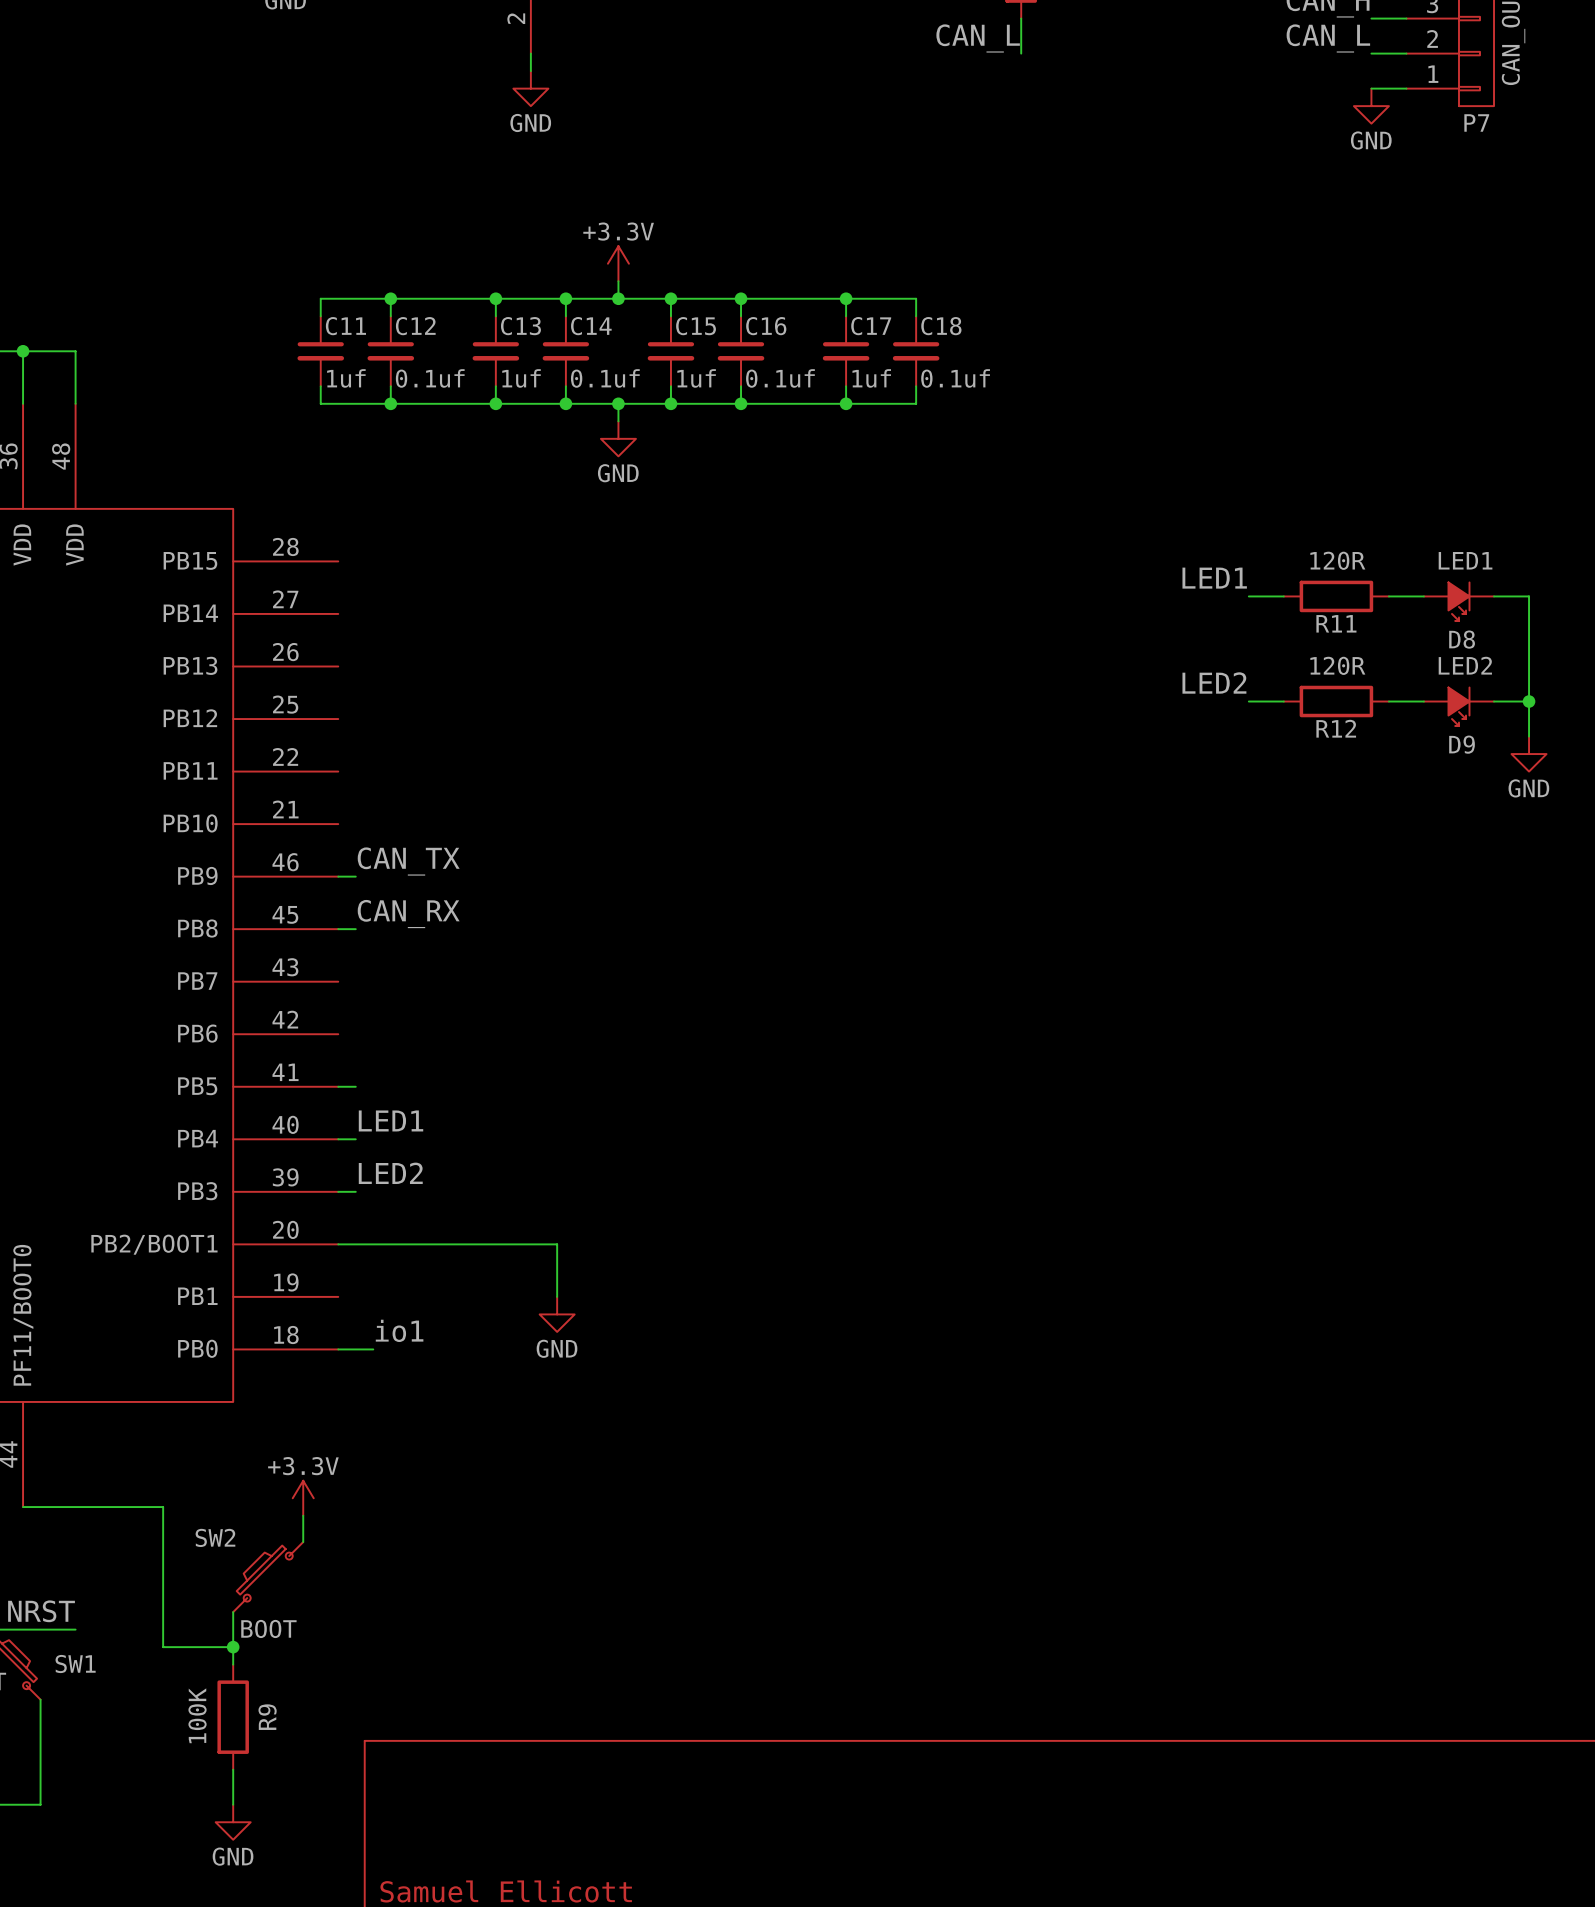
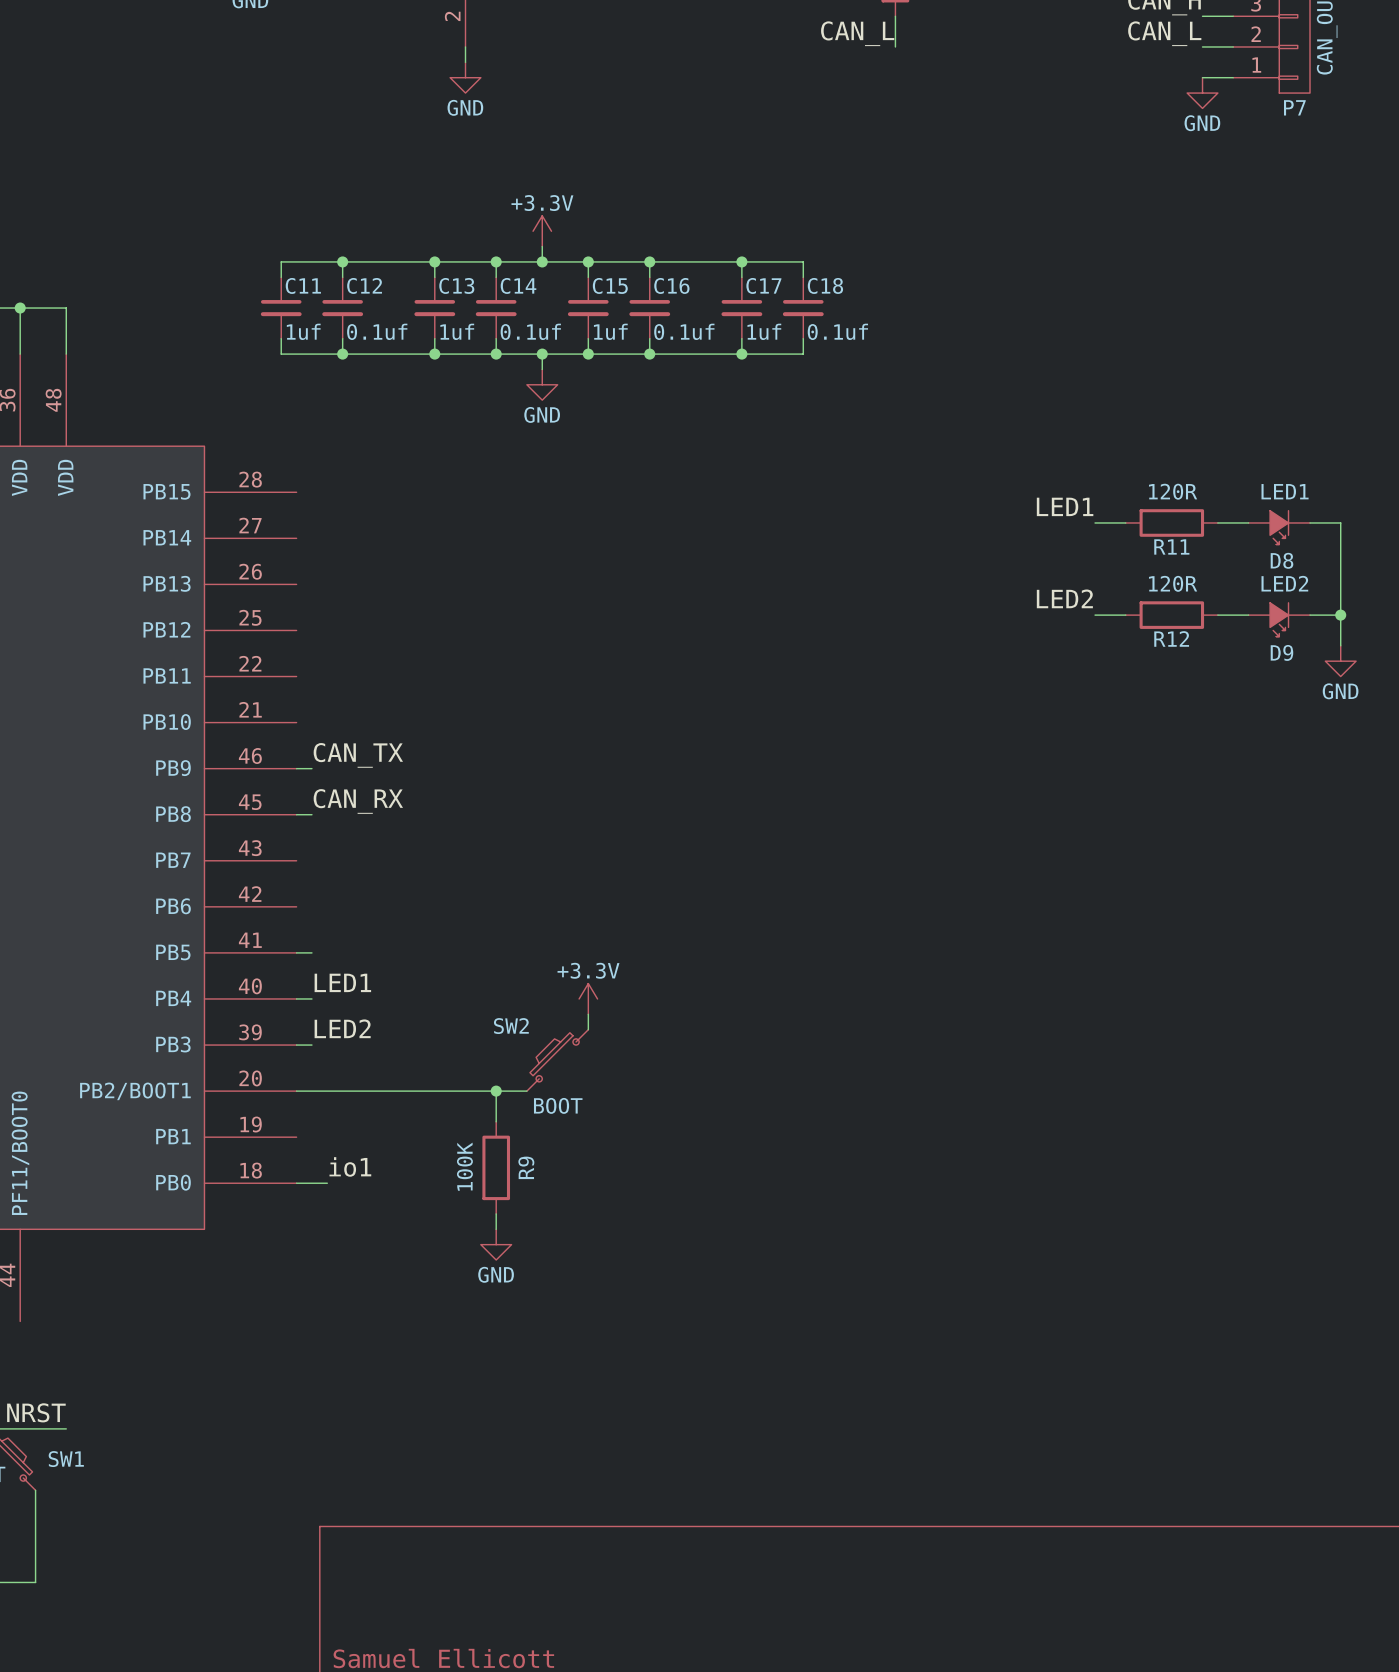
power symbol: none -> +3.3V (588, 998)
wire: none -> (588, 1014) (588, 1029)
wire: (557, 1244) (557, 1296) -> (488, 1091) (526, 1091)
wire: none -> (496, 1091) (496, 1121)
junction: none -> (496, 1091)
power symbol position: GND (557, 1314) -> GND (496, 1244)
wire: none -> (496, 1213) (496, 1229)
power symbol: +3.3V (303, 1498) -> none
wire: (23, 1507) (163, 1507) (163, 1647) (233, 1647) -> none
wire: (303, 1515) (303, 1542) -> none
SW2 position: (268, 1577) -> (557, 1060)
wire: (233, 1612) (233, 1664) -> none
junction: (233, 1647) -> none
R9 position: (233, 1717) -> (496, 1167)
wire: (233, 1769) (233, 1804) -> none
power symbol: GND (233, 1822) -> none

